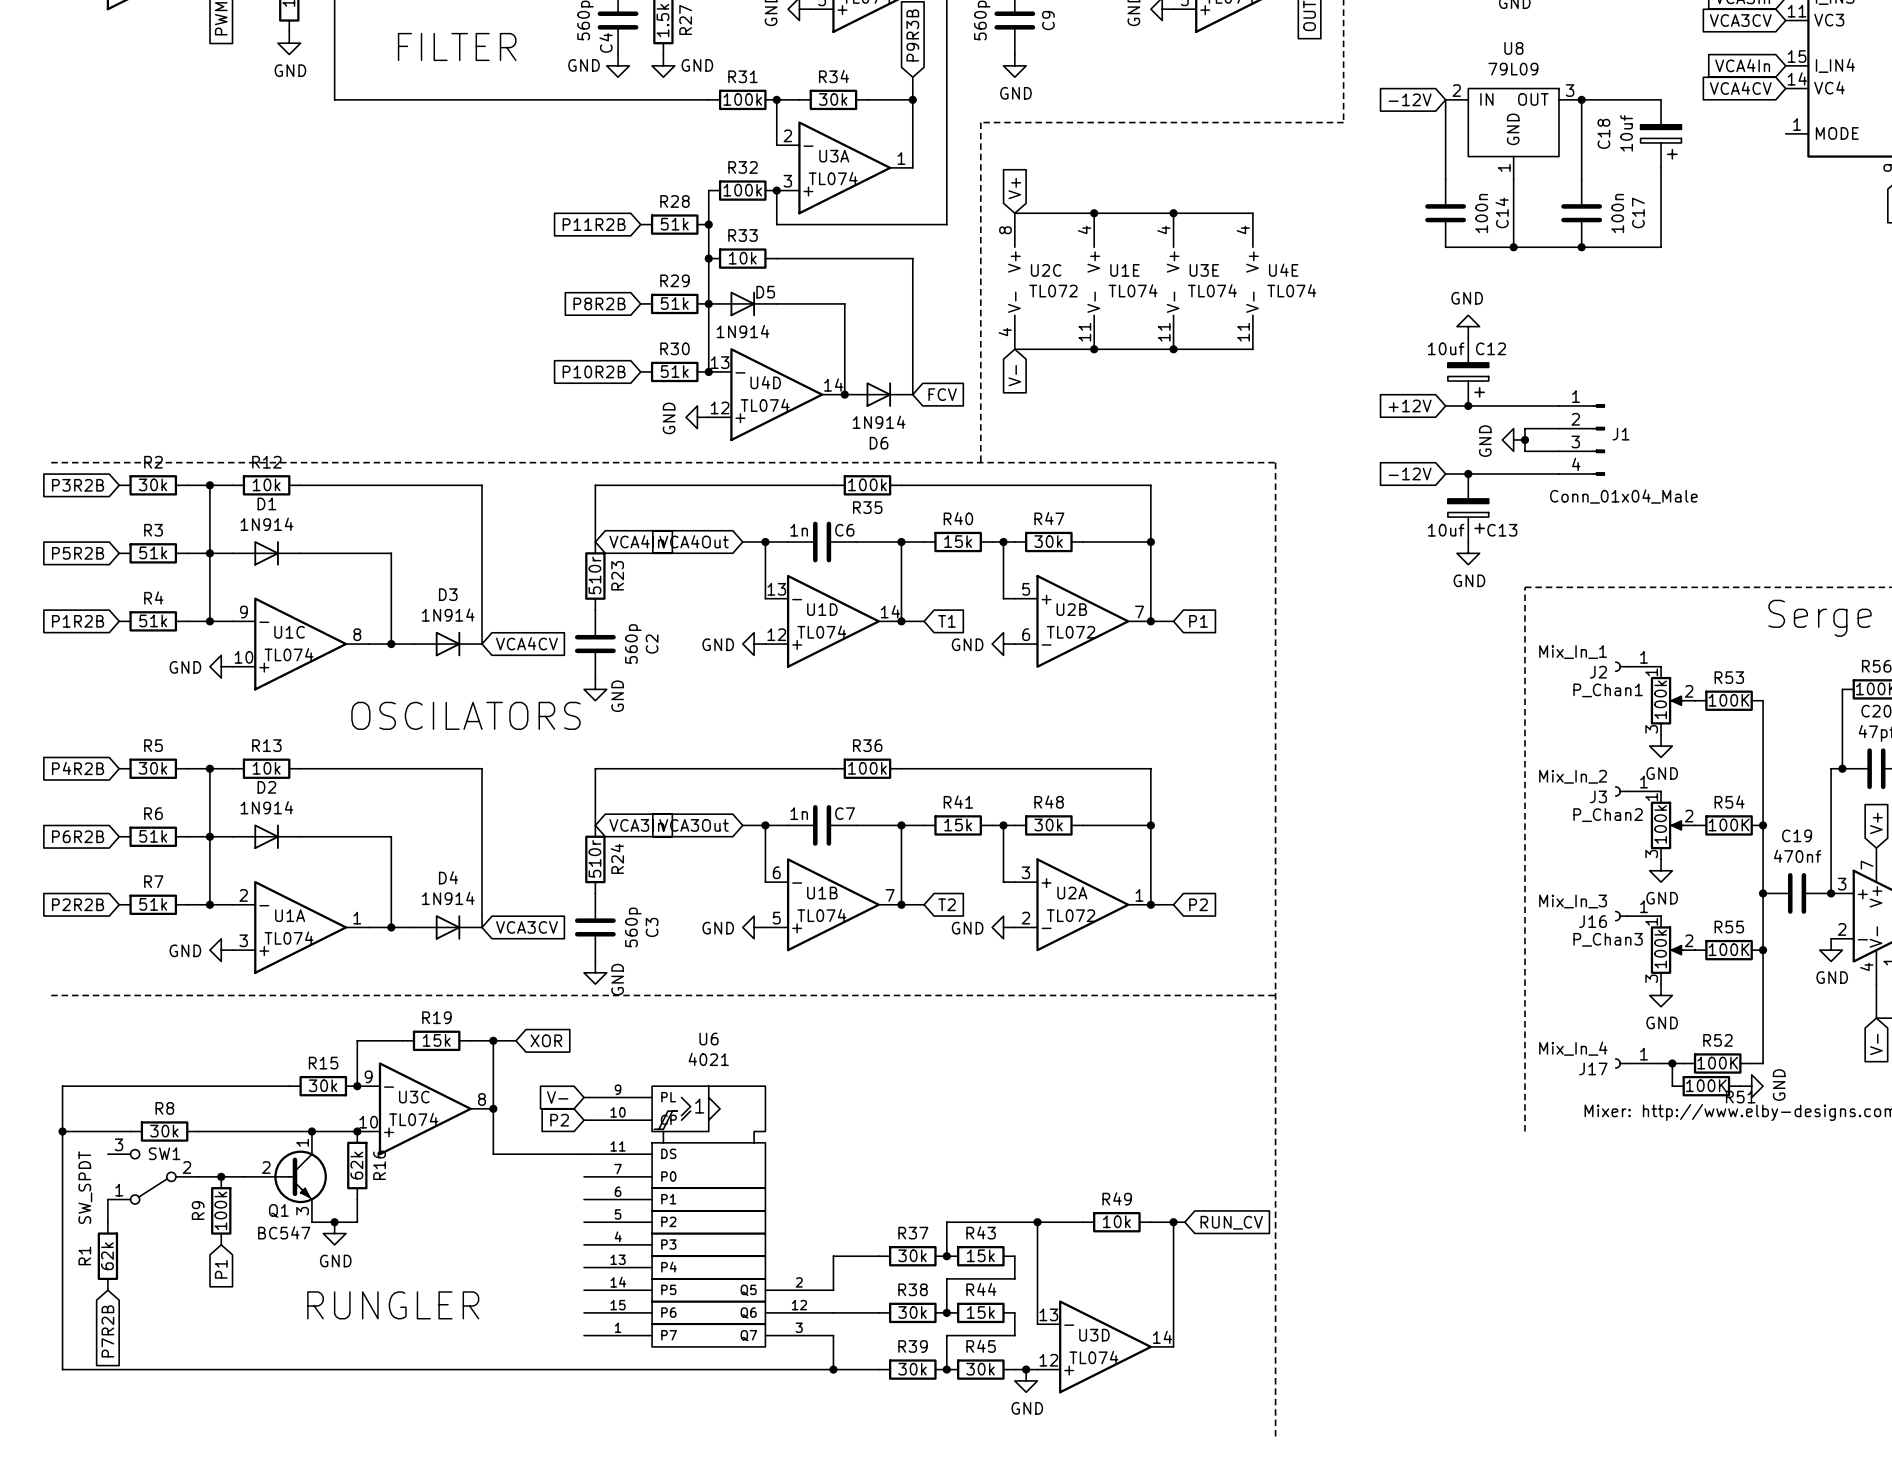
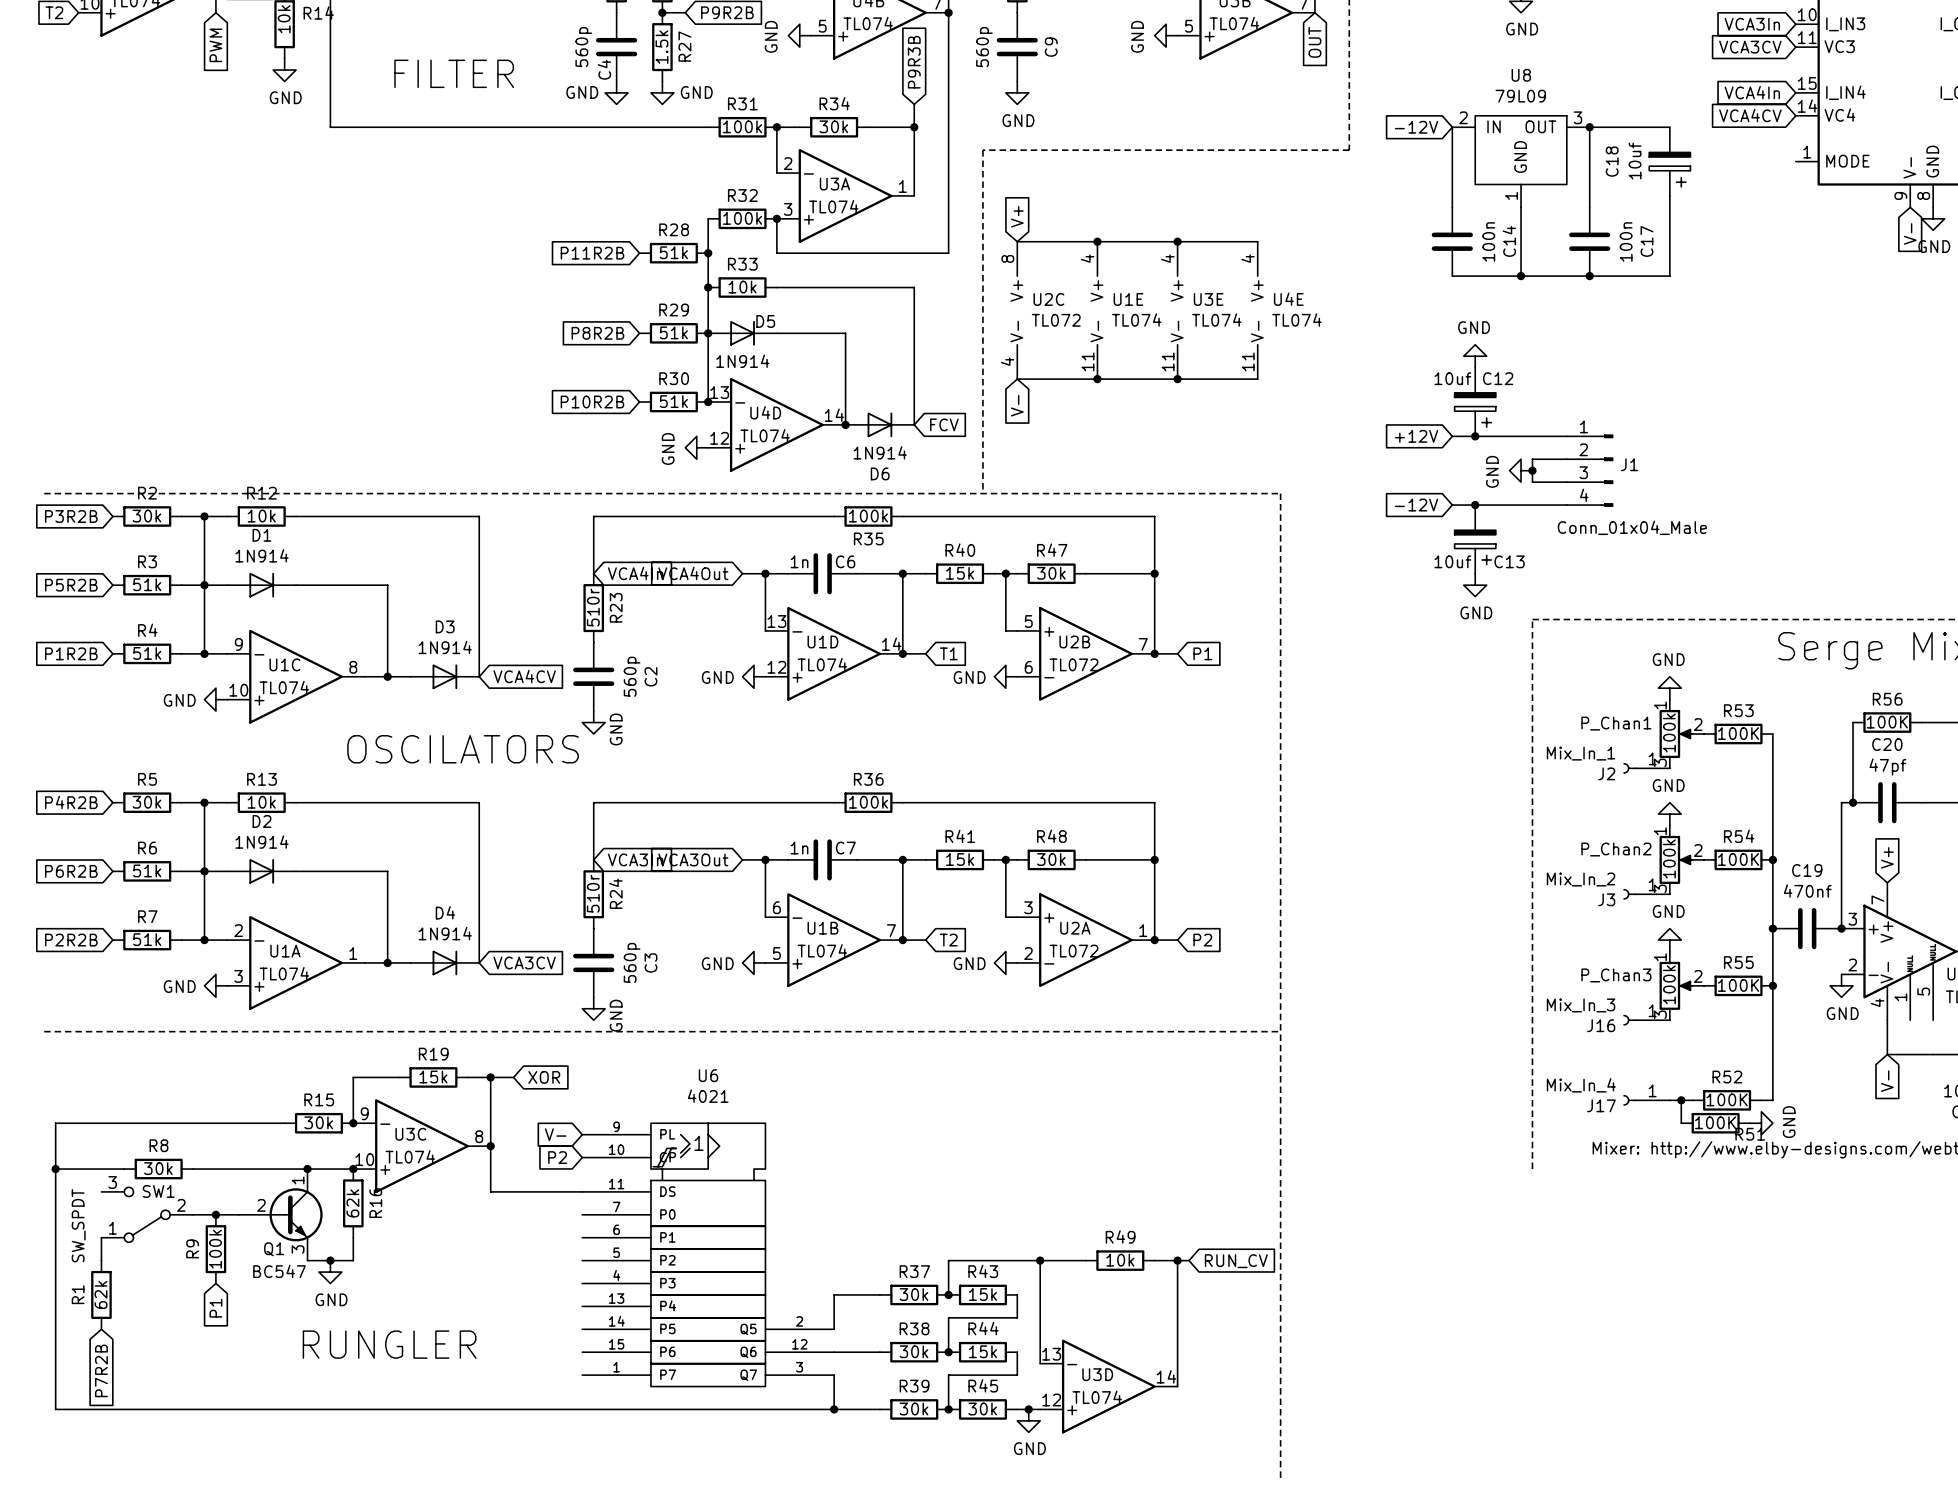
power symbol: none -> GND (1669, 688)
J2 position: (1638, 666) -> (1646, 768)
power symbol rotation: 0° (1661, 746) -> 180° (1669, 814)
power symbol position: GND (1661, 746) -> GND (1669, 814)
J3 position: (1638, 791) -> (1646, 894)
power symbol rotation: 0° (1661, 870) -> 180° (1669, 940)
power symbol position: GND (1661, 870) -> GND (1669, 940)
J16 position: (1638, 916) -> (1646, 1020)
power symbol: GND (1661, 995) -> none

